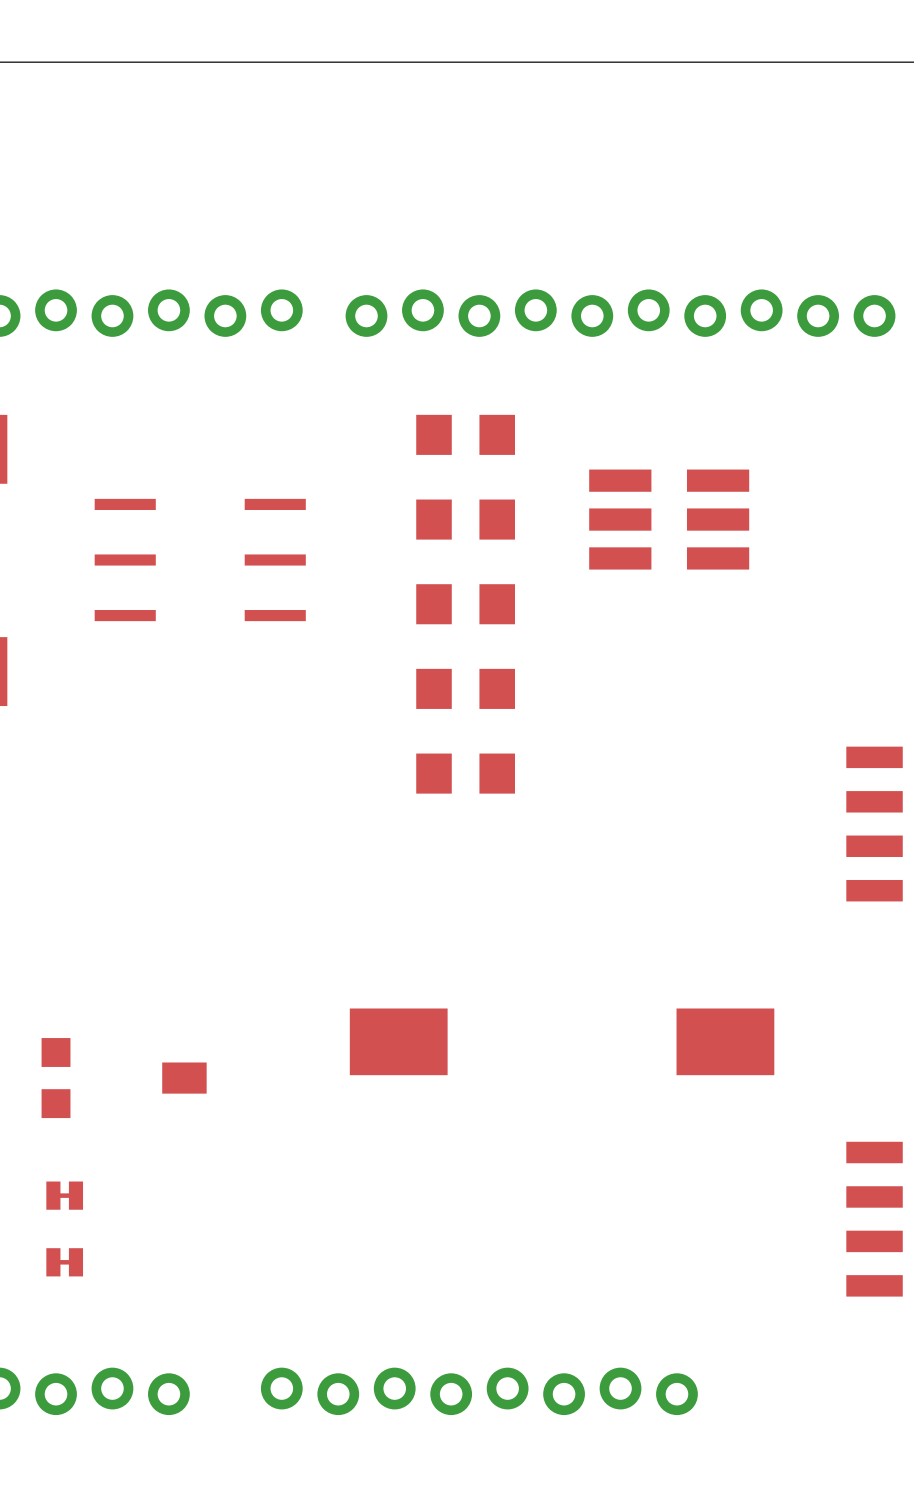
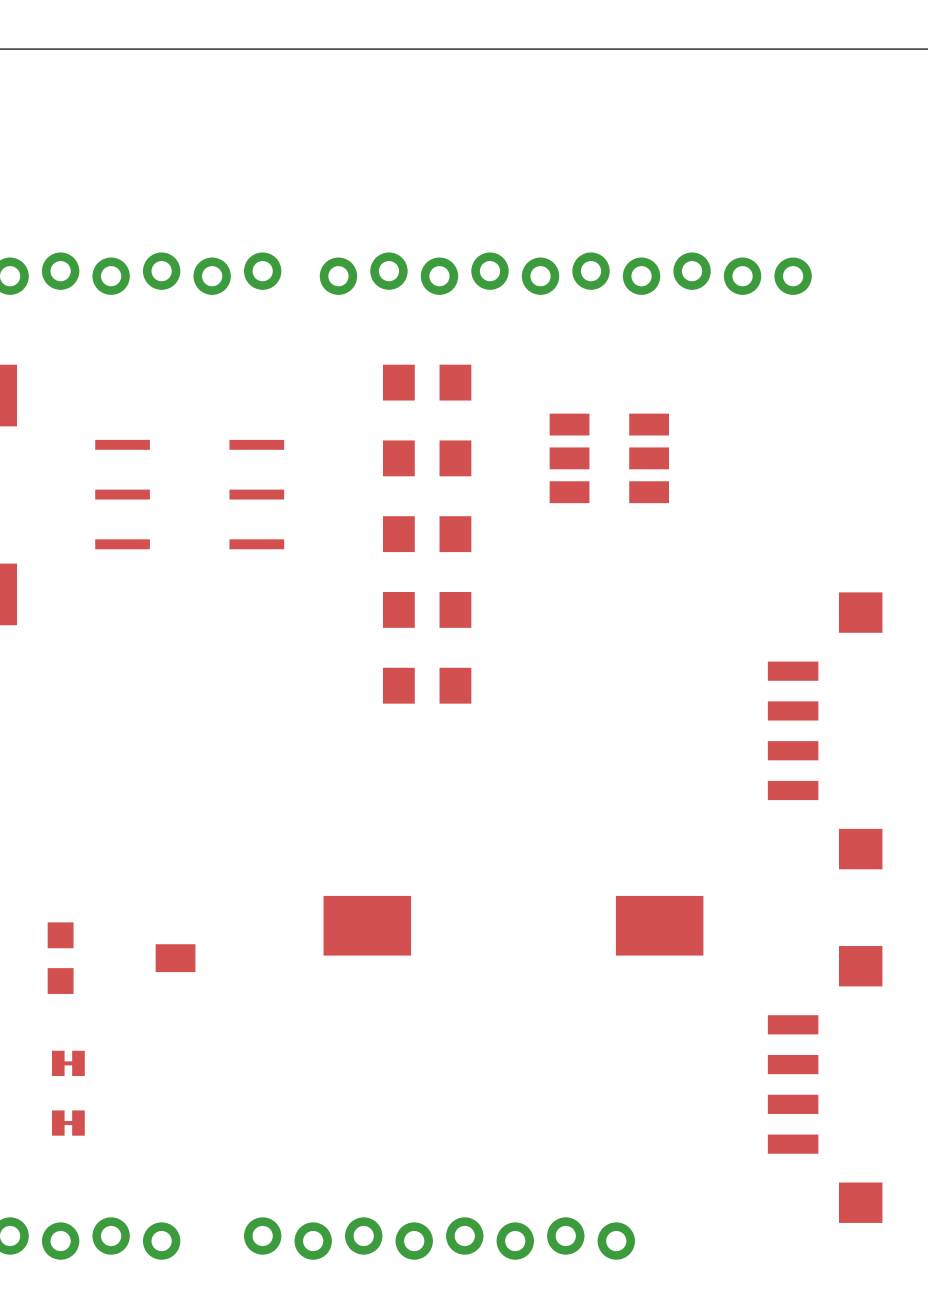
part footprint: [589, 469, 750, 570] -> [549, 413, 670, 504]

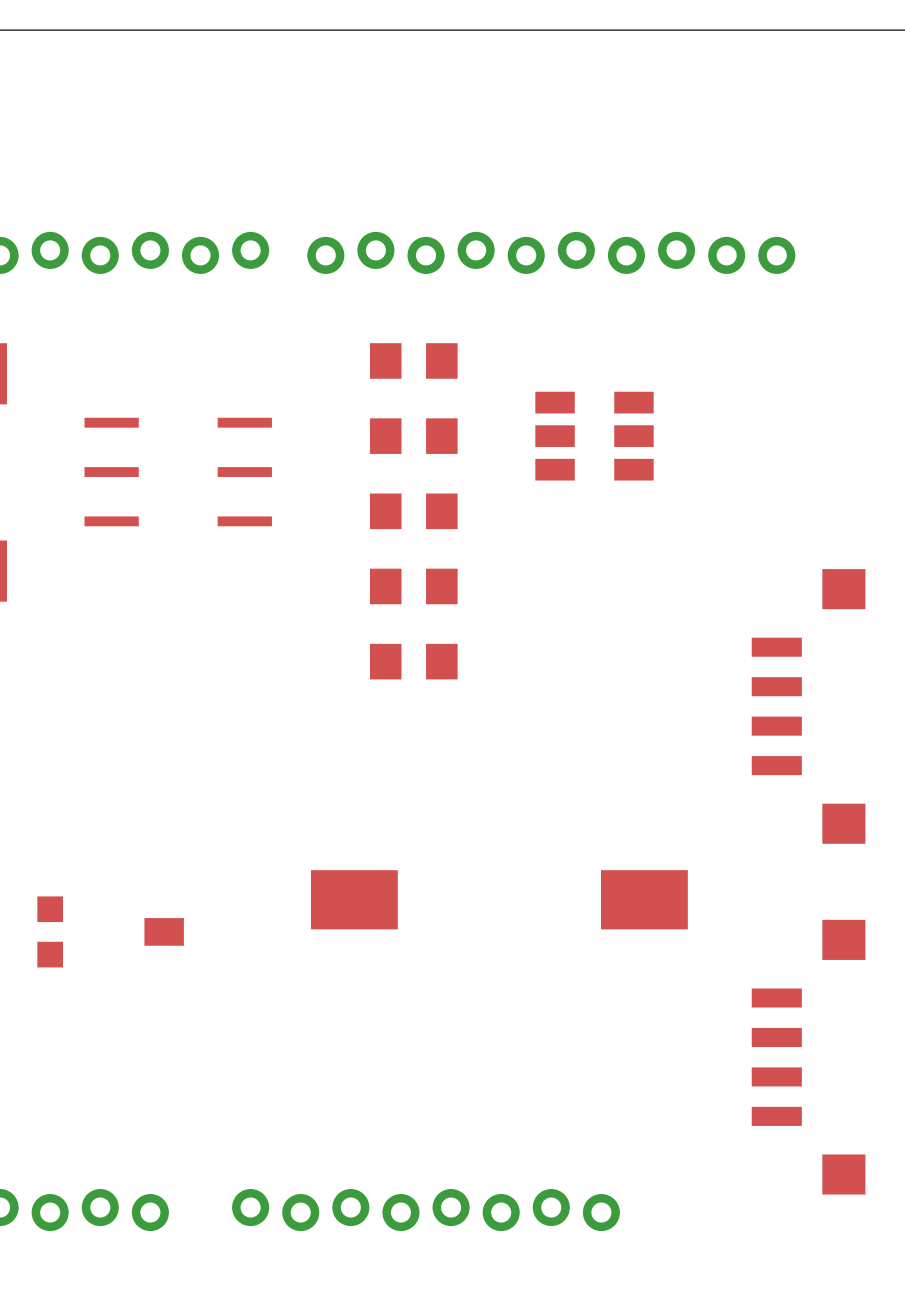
part: (68, 1063) -> none
part: (68, 1123) -> none

